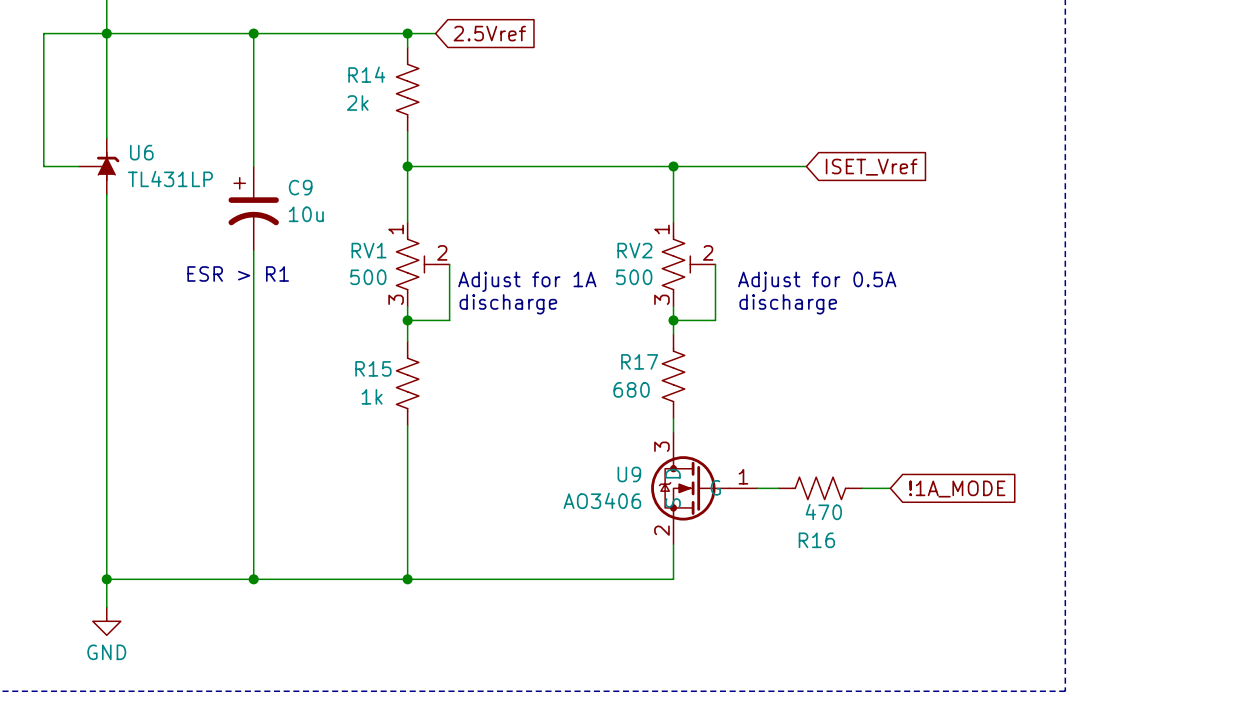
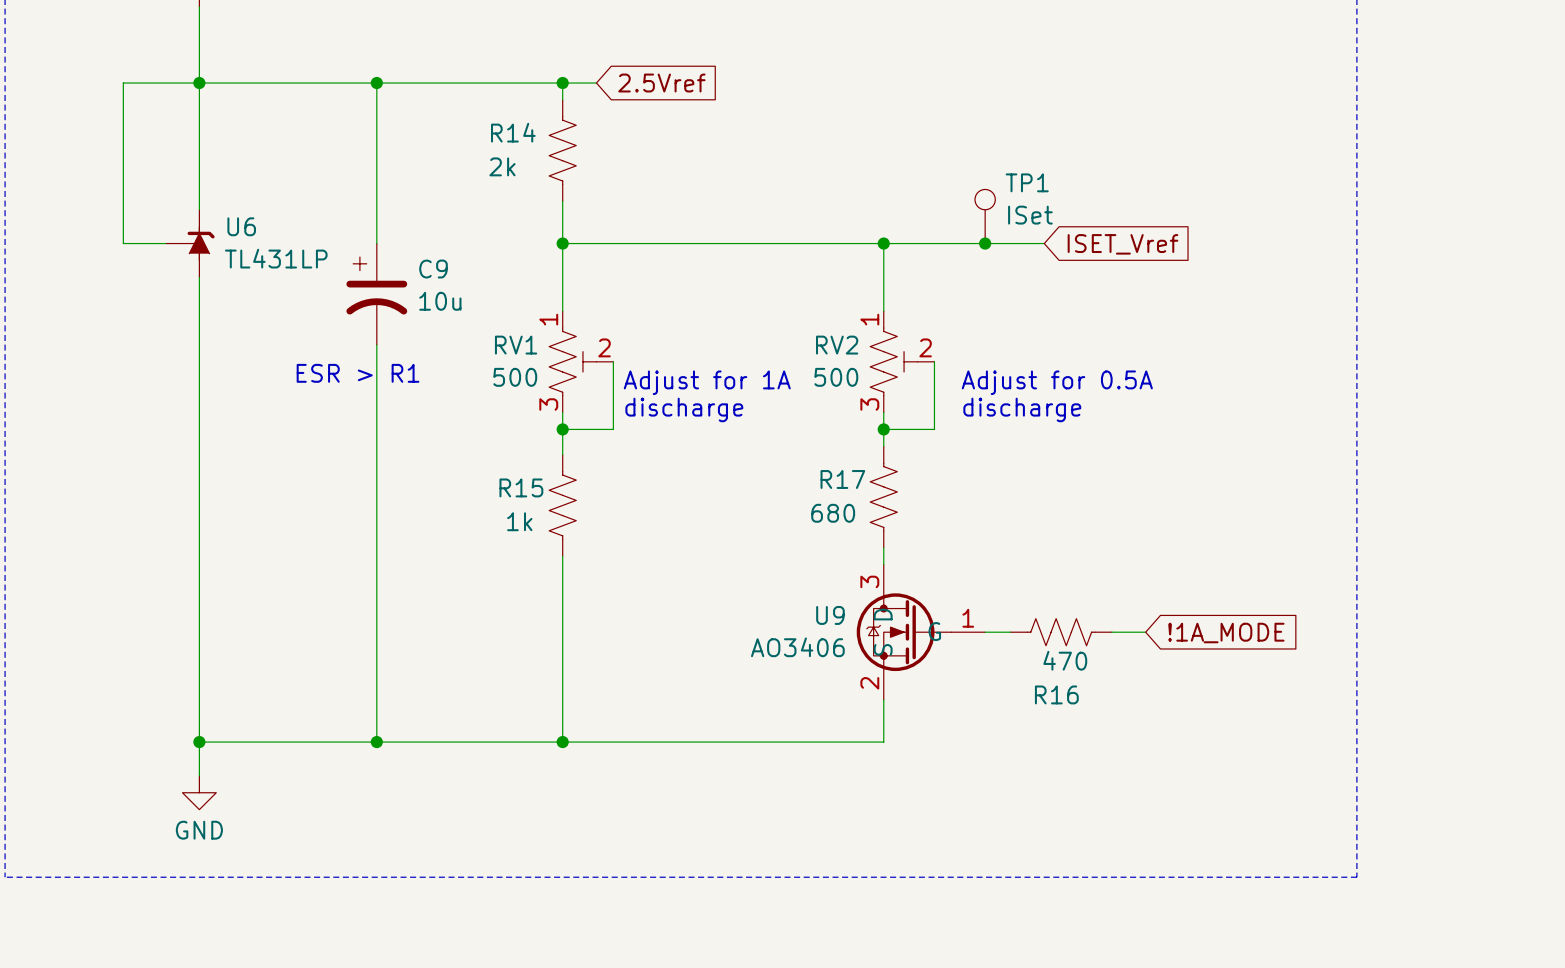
TP1: none -> ISet (985, 216)
junction: none -> (985, 243)

